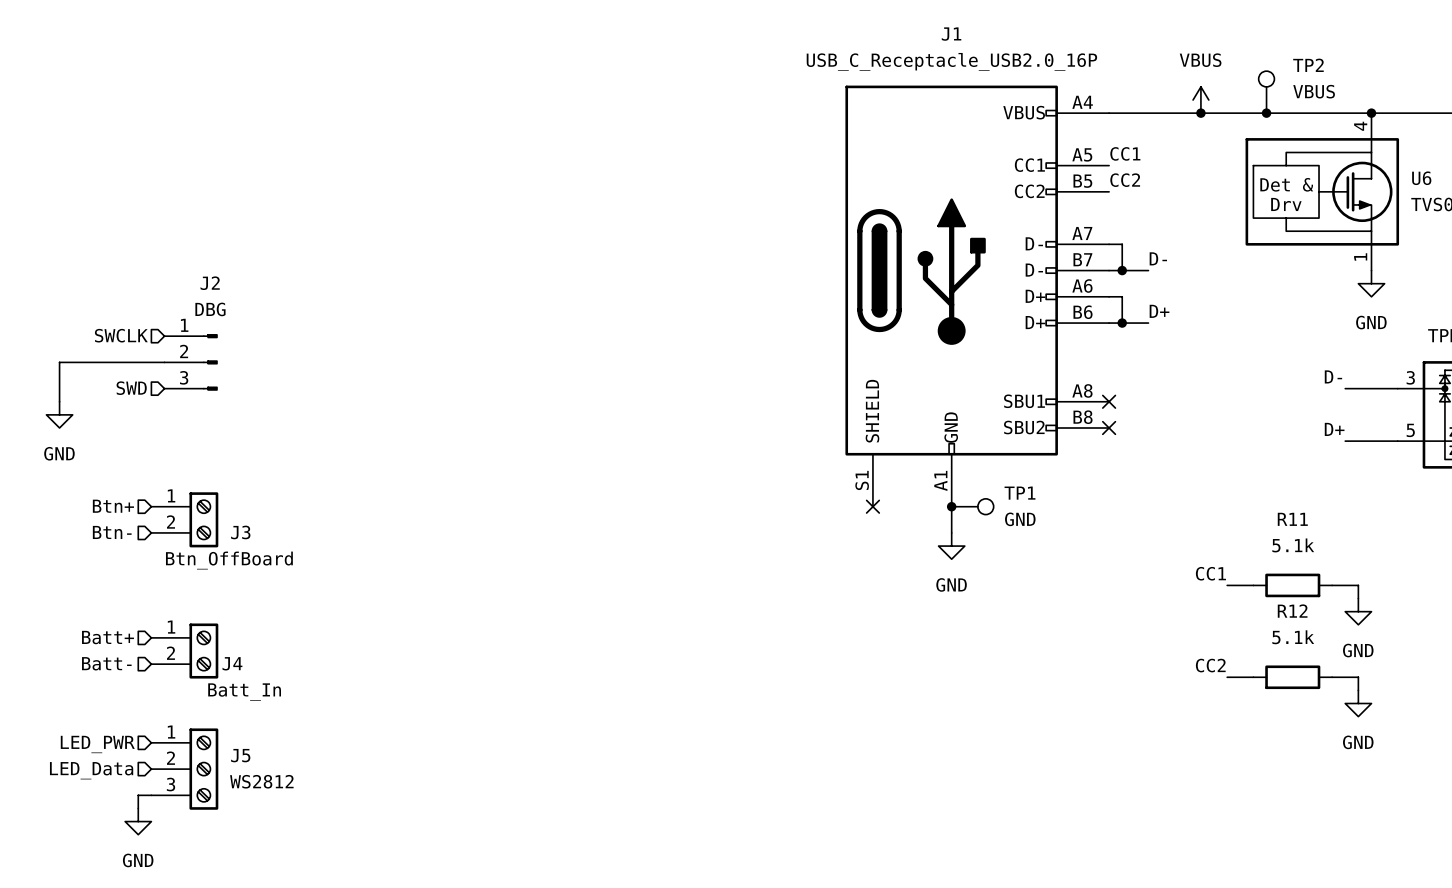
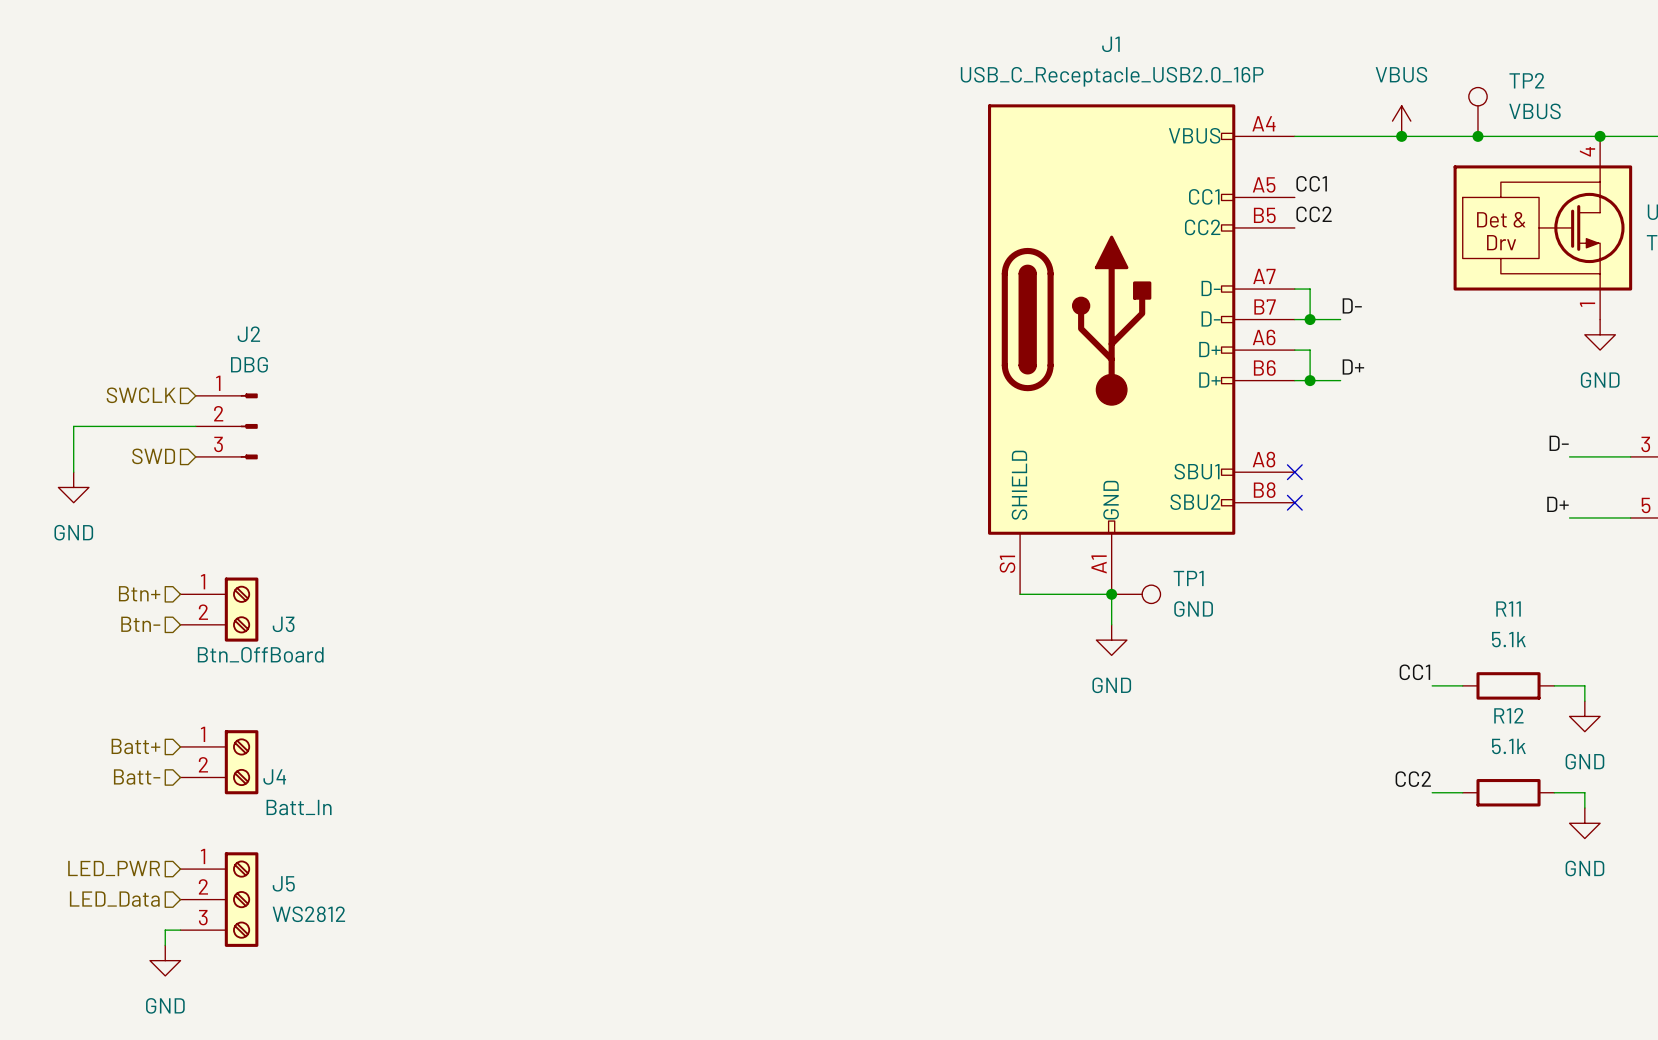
wire: none -> (1020, 594) (1111, 594)
no-connect mark: (872, 506) -> none

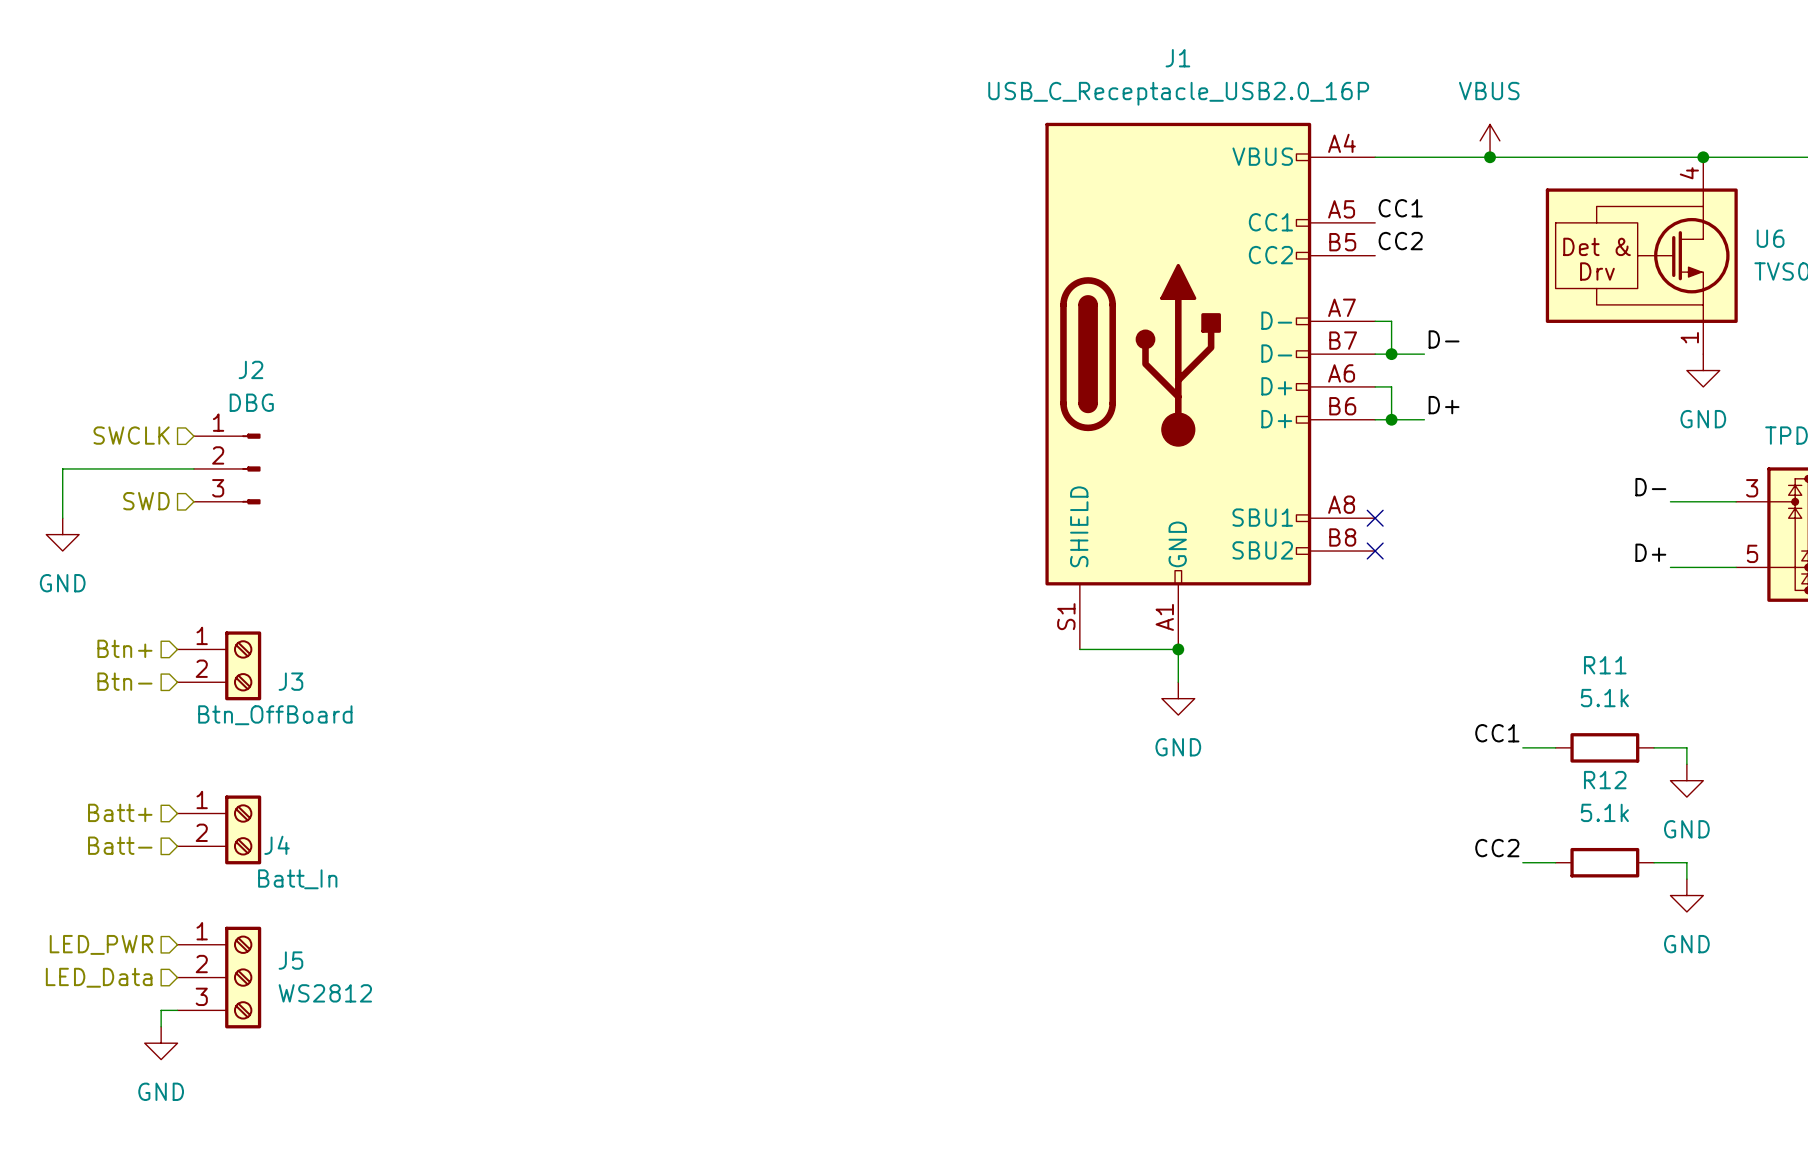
TP2: VBUS (1477, 111) -> none
junction: (1477, 136) -> none
TP1: GND (1136, 594) -> none

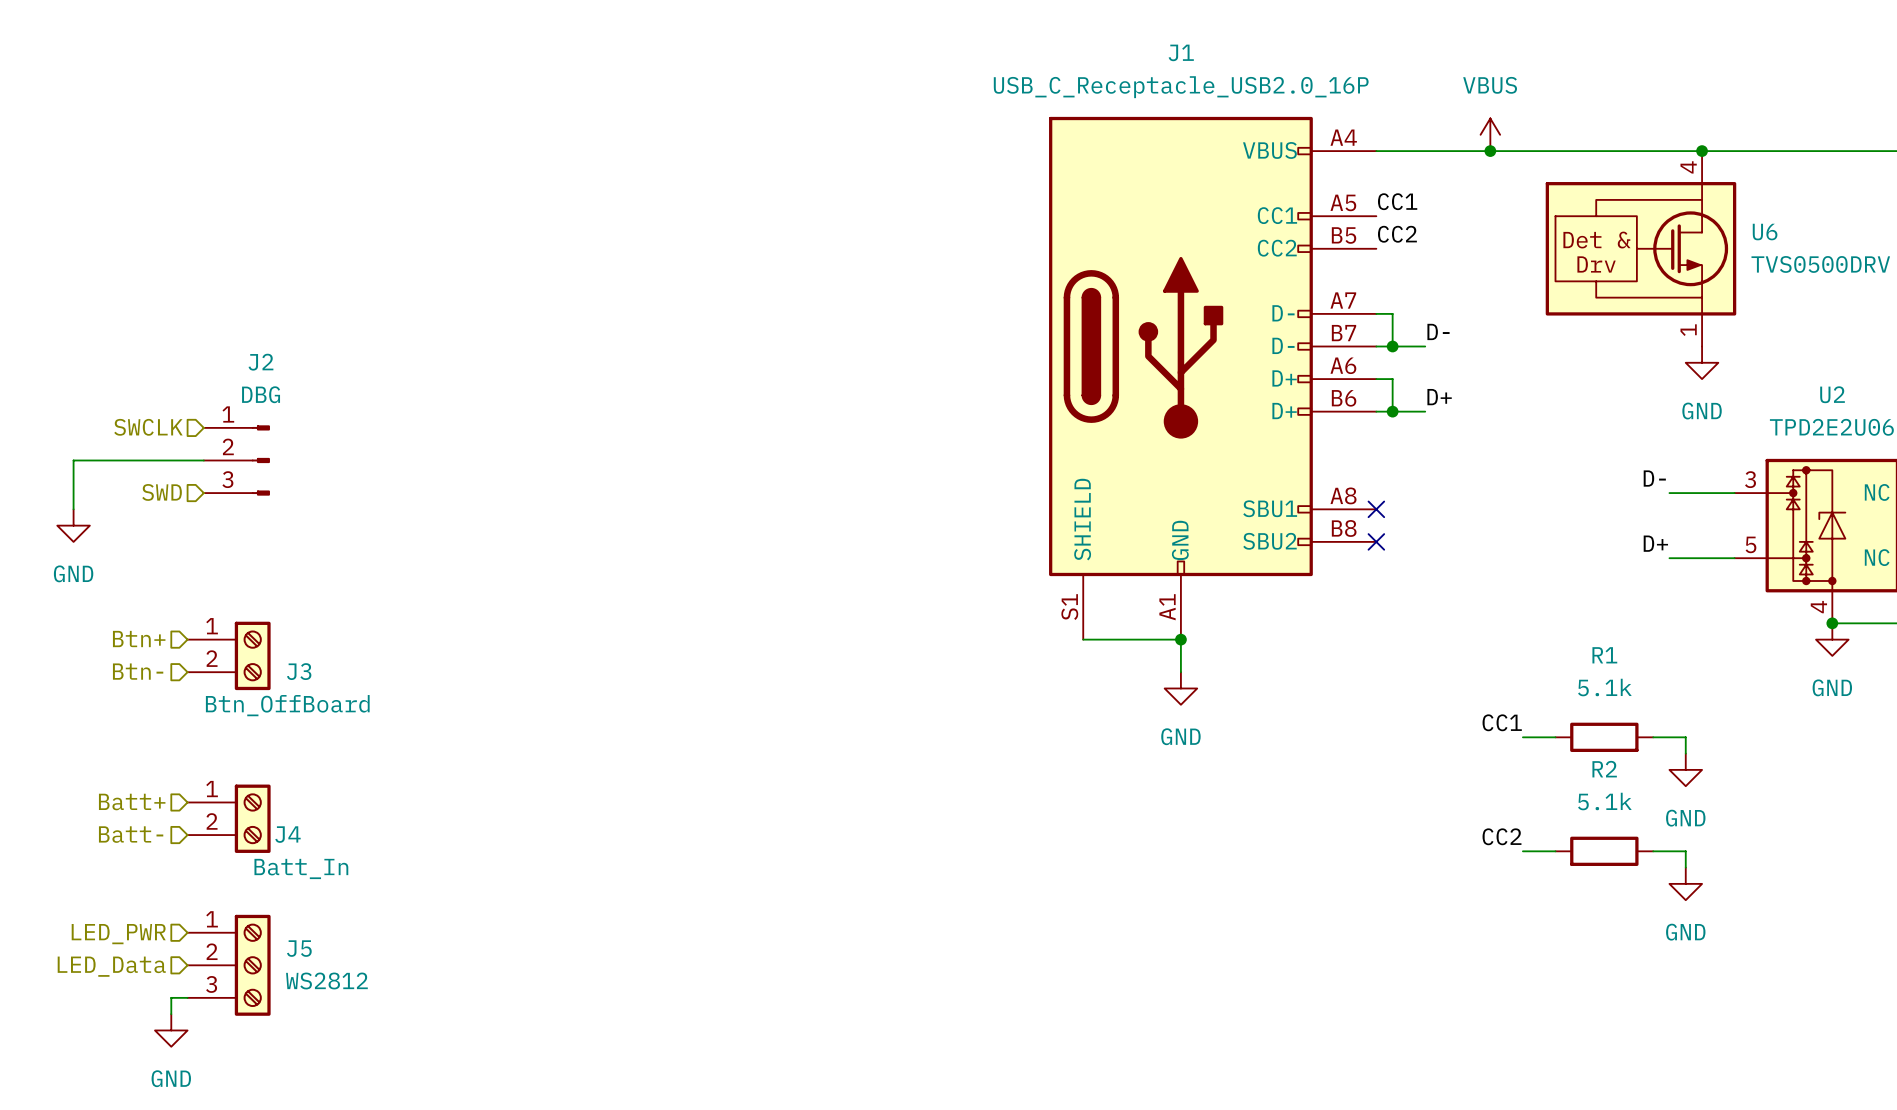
R11 name: R11 (1605, 665) -> R1 (1604, 655)
R12 name: R12 (1605, 780) -> R2 (1604, 769)

